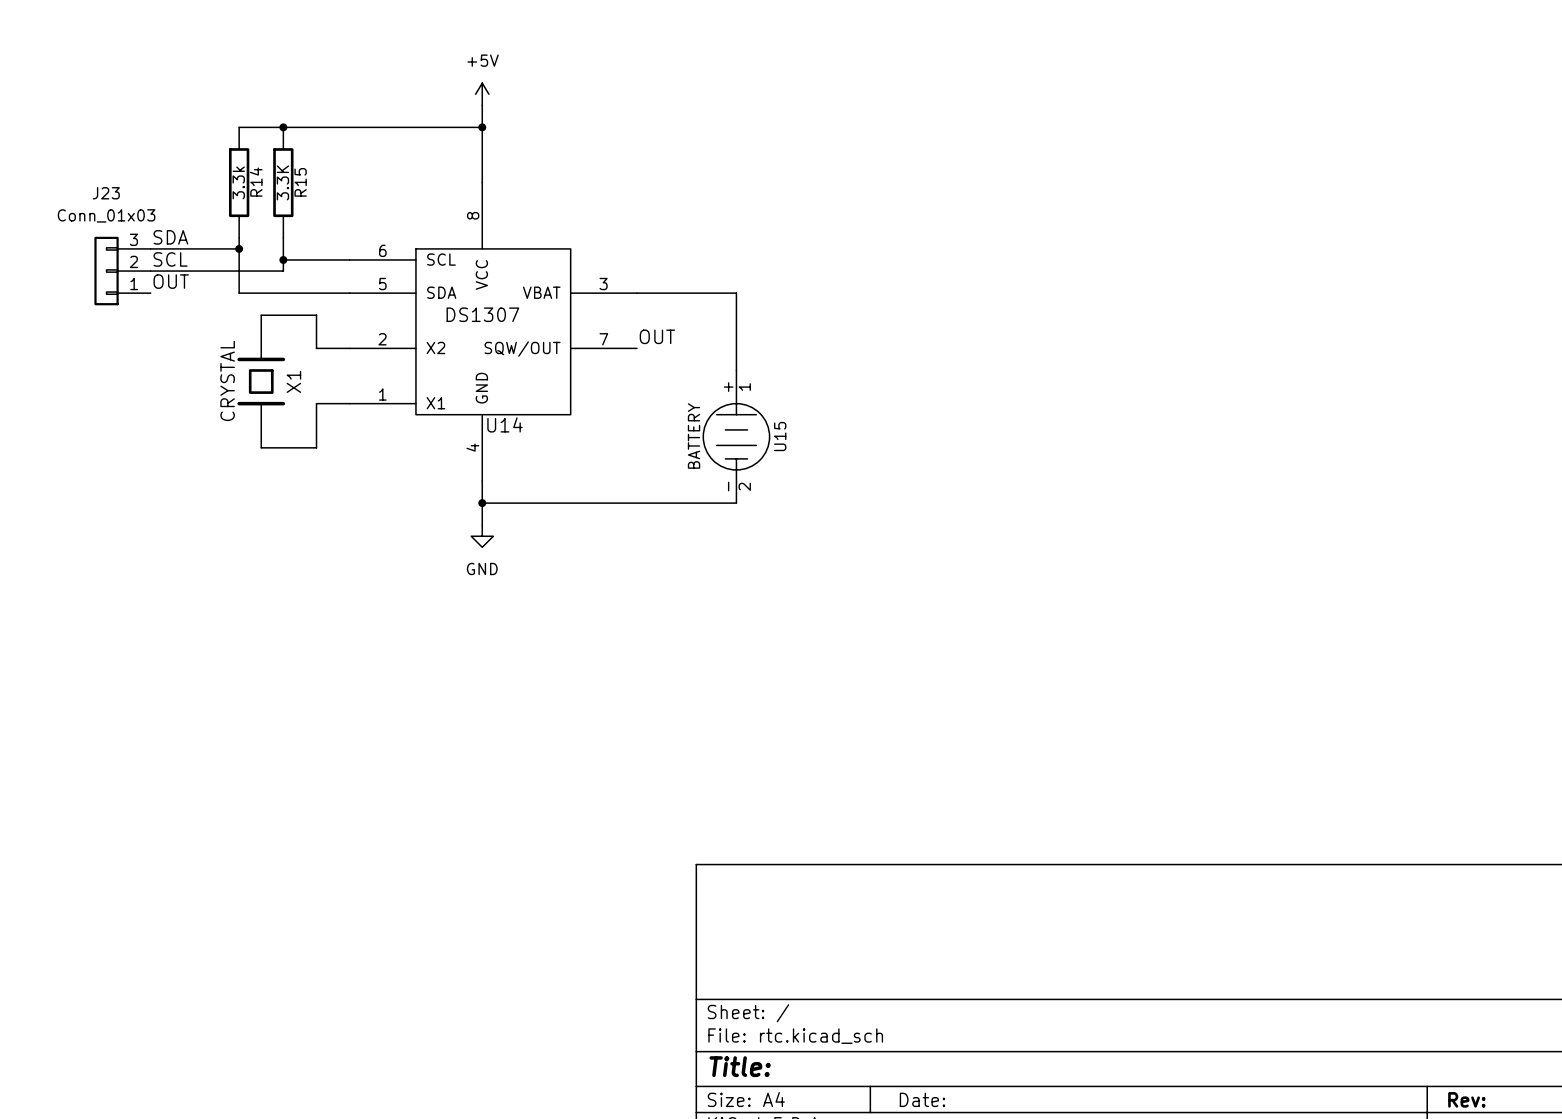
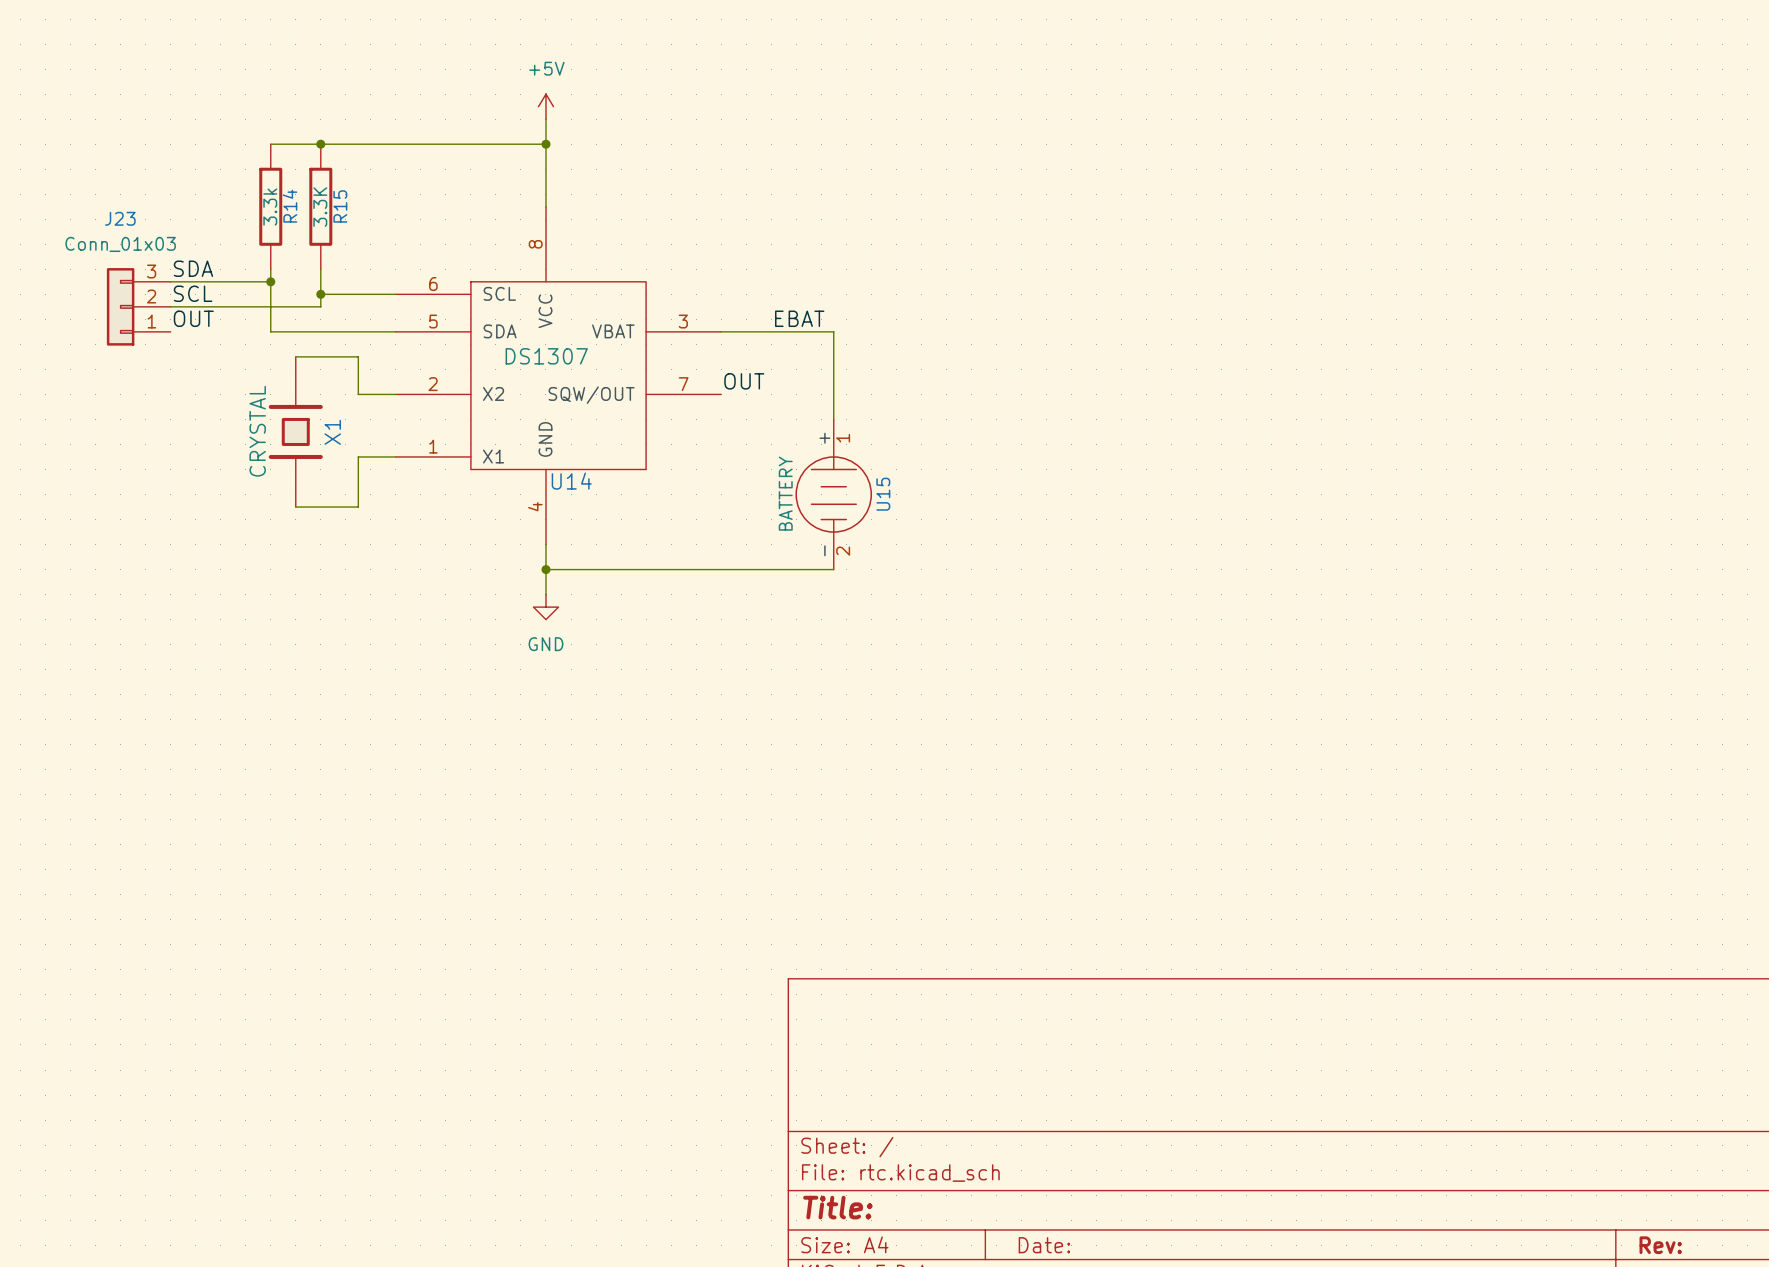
label: none -> EBAT (799, 318)

